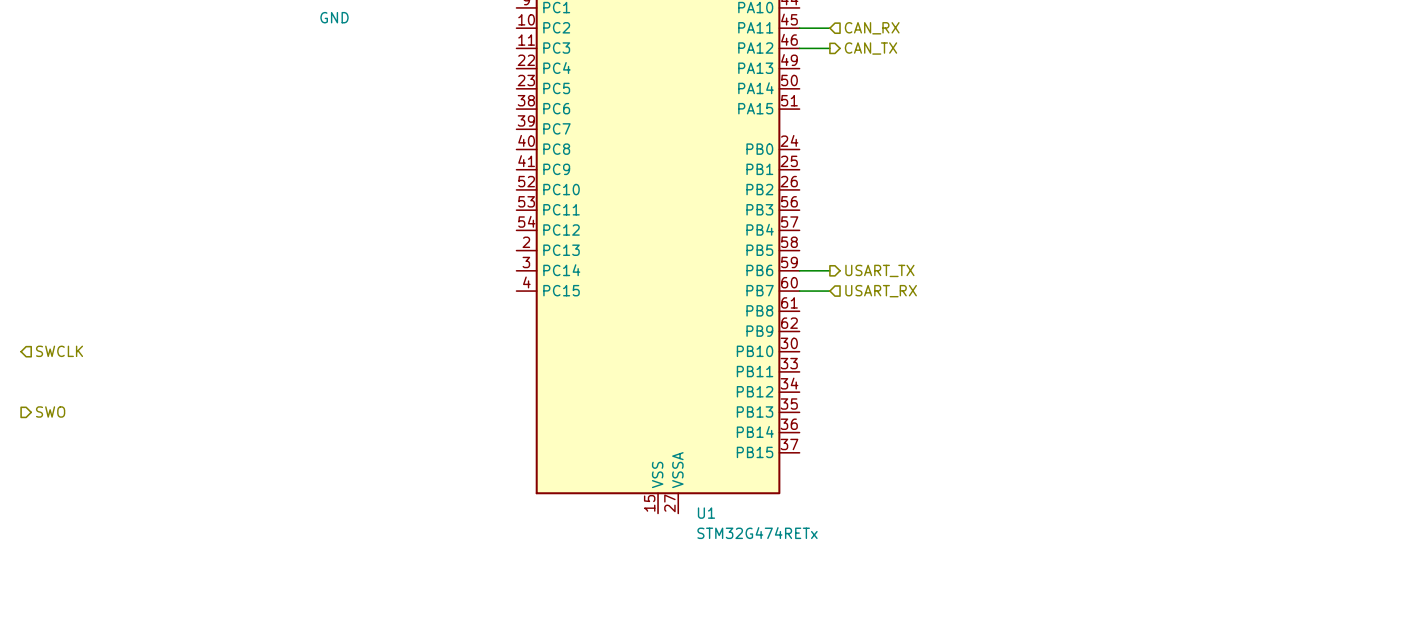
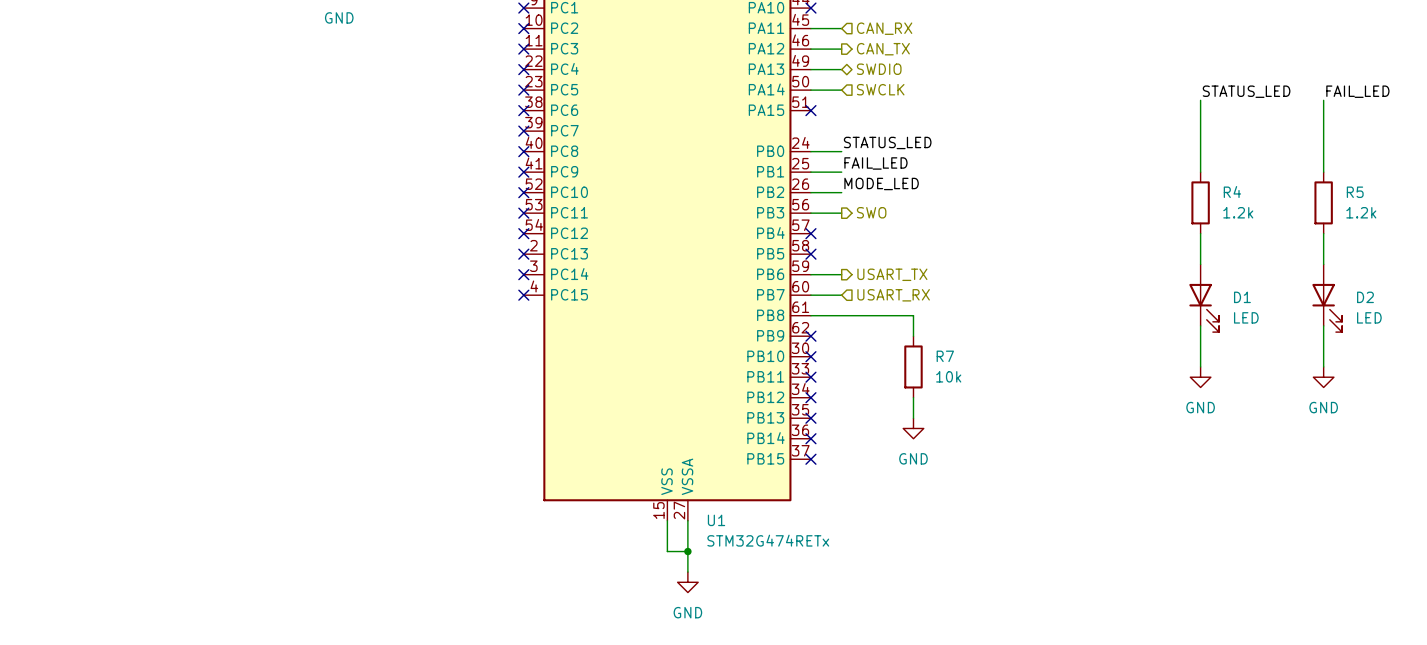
no-connect mark: none -> (523, 8)
no-connect mark: none -> (810, 8)
no-connect mark: none -> (523, 28)
no-connect mark: none -> (523, 49)
no-connect mark: none -> (523, 69)
wire: none -> (810, 69) (841, 69)
hierarchical label: none -> SWDIO (879, 69)
no-connect mark: none -> (523, 90)
wire: none -> (810, 90) (841, 90)
hierarchical label: none -> SWCLK (880, 89)
label: none -> STATUS_LED (1246, 91)
label: none -> FAIL_LED (1357, 91)
wire: none -> (1200, 100) (1200, 172)
wire: none -> (1323, 100) (1323, 172)
no-connect mark: none -> (523, 110)
no-connect mark: none -> (810, 110)
no-connect mark: none -> (523, 131)
label: none -> STATUS_LED (887, 142)
no-connect mark: none -> (523, 151)
wire: none -> (810, 151) (841, 151)
label: none -> FAIL_LED (875, 163)
no-connect mark: none -> (523, 172)
wire: none -> (810, 172) (841, 172)
label: none -> MODE_LED (881, 183)
no-connect mark: none -> (523, 192)
wire: none -> (810, 192) (841, 192)
R4: none -> 1.2k (1200, 202)
R5: none -> 1.2k (1323, 202)
hierarchical label: none -> SWO (871, 212)
no-connect mark: none -> (523, 213)
wire: none -> (810, 213) (841, 213)
no-connect mark: none -> (523, 233)
no-connect mark: none -> (810, 233)
wire: none -> (1200, 233) (1200, 264)
wire: none -> (1323, 233) (1323, 264)
no-connect mark: none -> (523, 254)
no-connect mark: none -> (810, 254)
no-connect mark: none -> (523, 274)
no-connect mark: none -> (523, 295)
D1: none -> LED (1204, 298)
D2: none -> LED (1327, 298)
wire: none -> (810, 315) (913, 315) (913, 336)
wire: none -> (1200, 325) (1200, 366)
wire: none -> (1323, 325) (1323, 366)
no-connect mark: none -> (810, 336)
hierarchical label: SWCLK (59, 351) -> none
no-connect mark: none -> (810, 356)
R7: none -> 10k (913, 366)
no-connect mark: none -> (810, 377)
power symbol: none -> GND (1200, 377)
power symbol: none -> GND (1323, 377)
no-connect mark: none -> (810, 397)
wire: none -> (913, 397) (913, 418)
hierarchical label: SWO (50, 411) -> none
no-connect mark: none -> (810, 418)
power symbol: none -> GND (913, 428)
no-connect mark: none -> (810, 438)
no-connect mark: none -> (810, 459)
wire: none -> (667, 520) (667, 551) (687, 551)
wire: none -> (687, 520) (687, 572)
junction: none -> (687, 551)
power symbol: none -> GND (687, 582)

